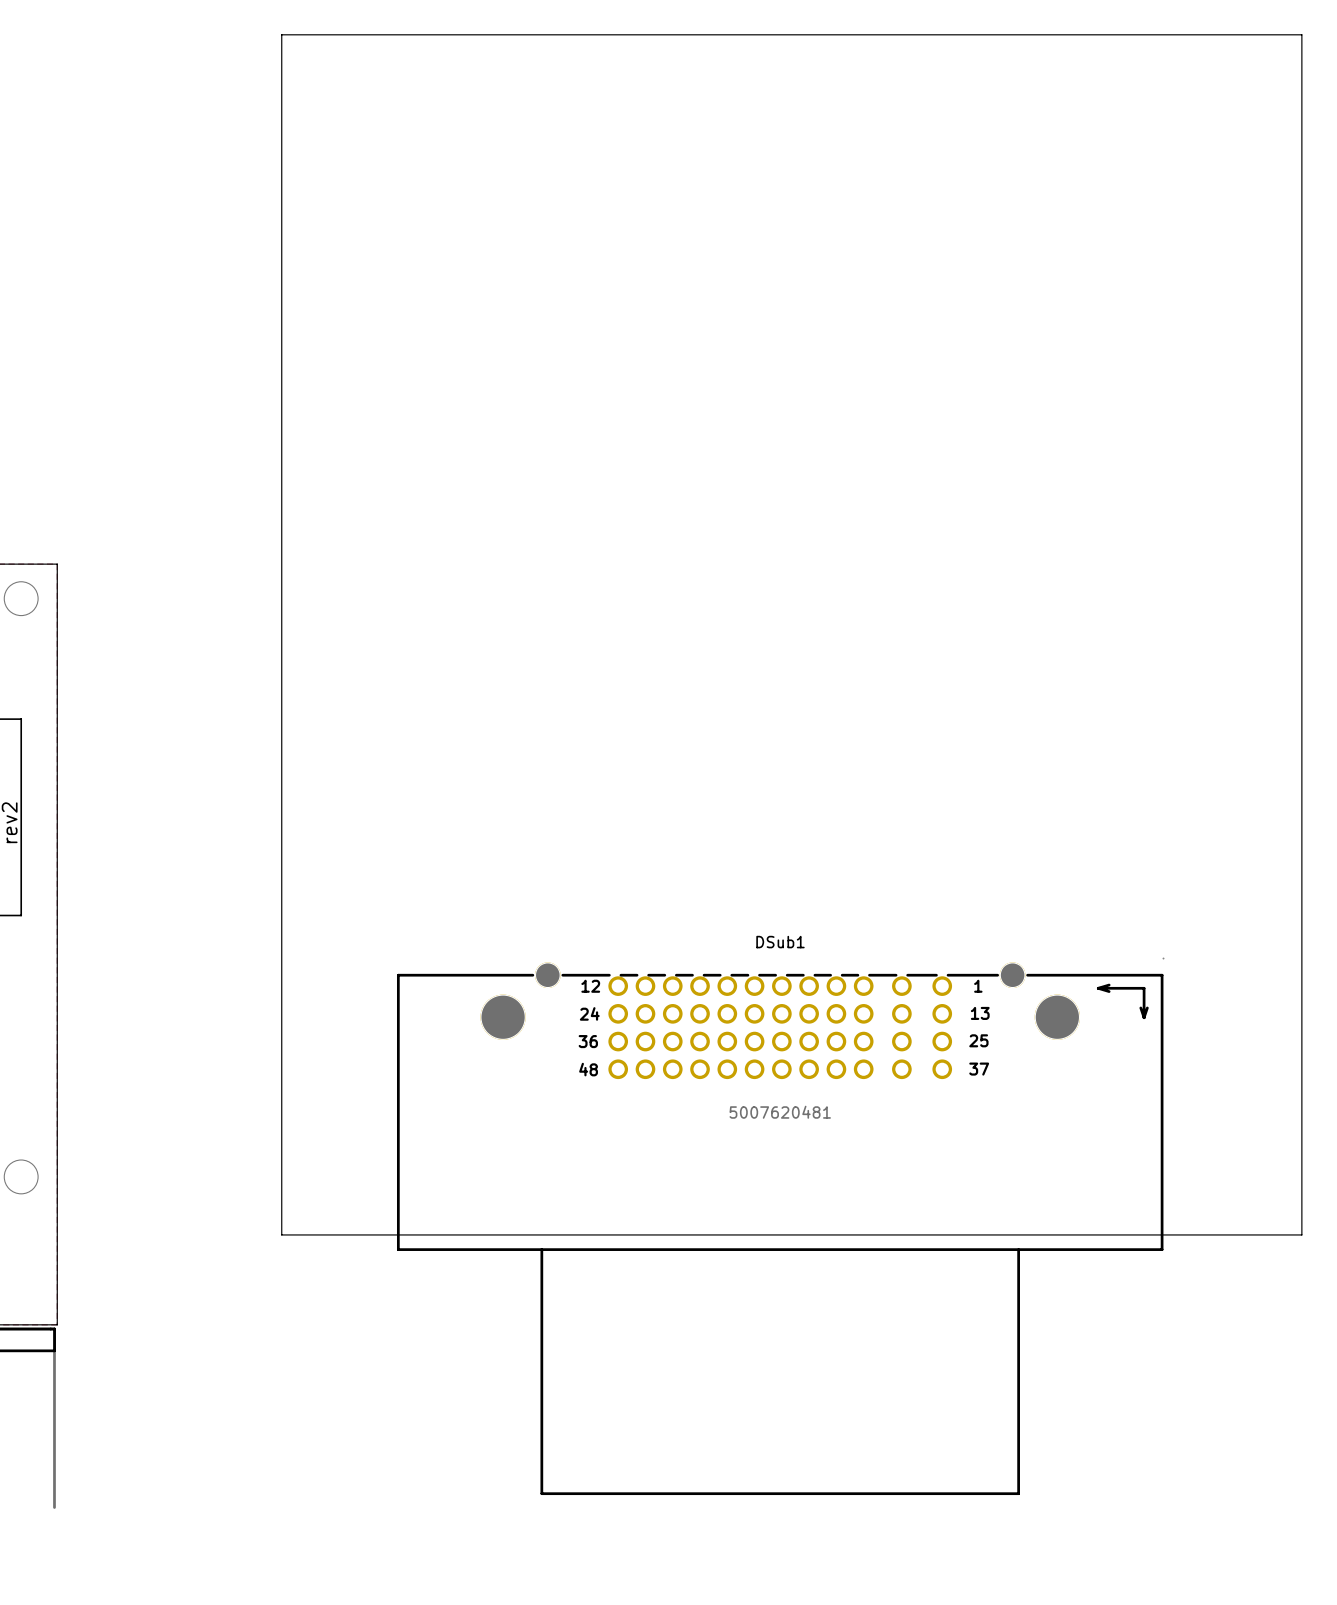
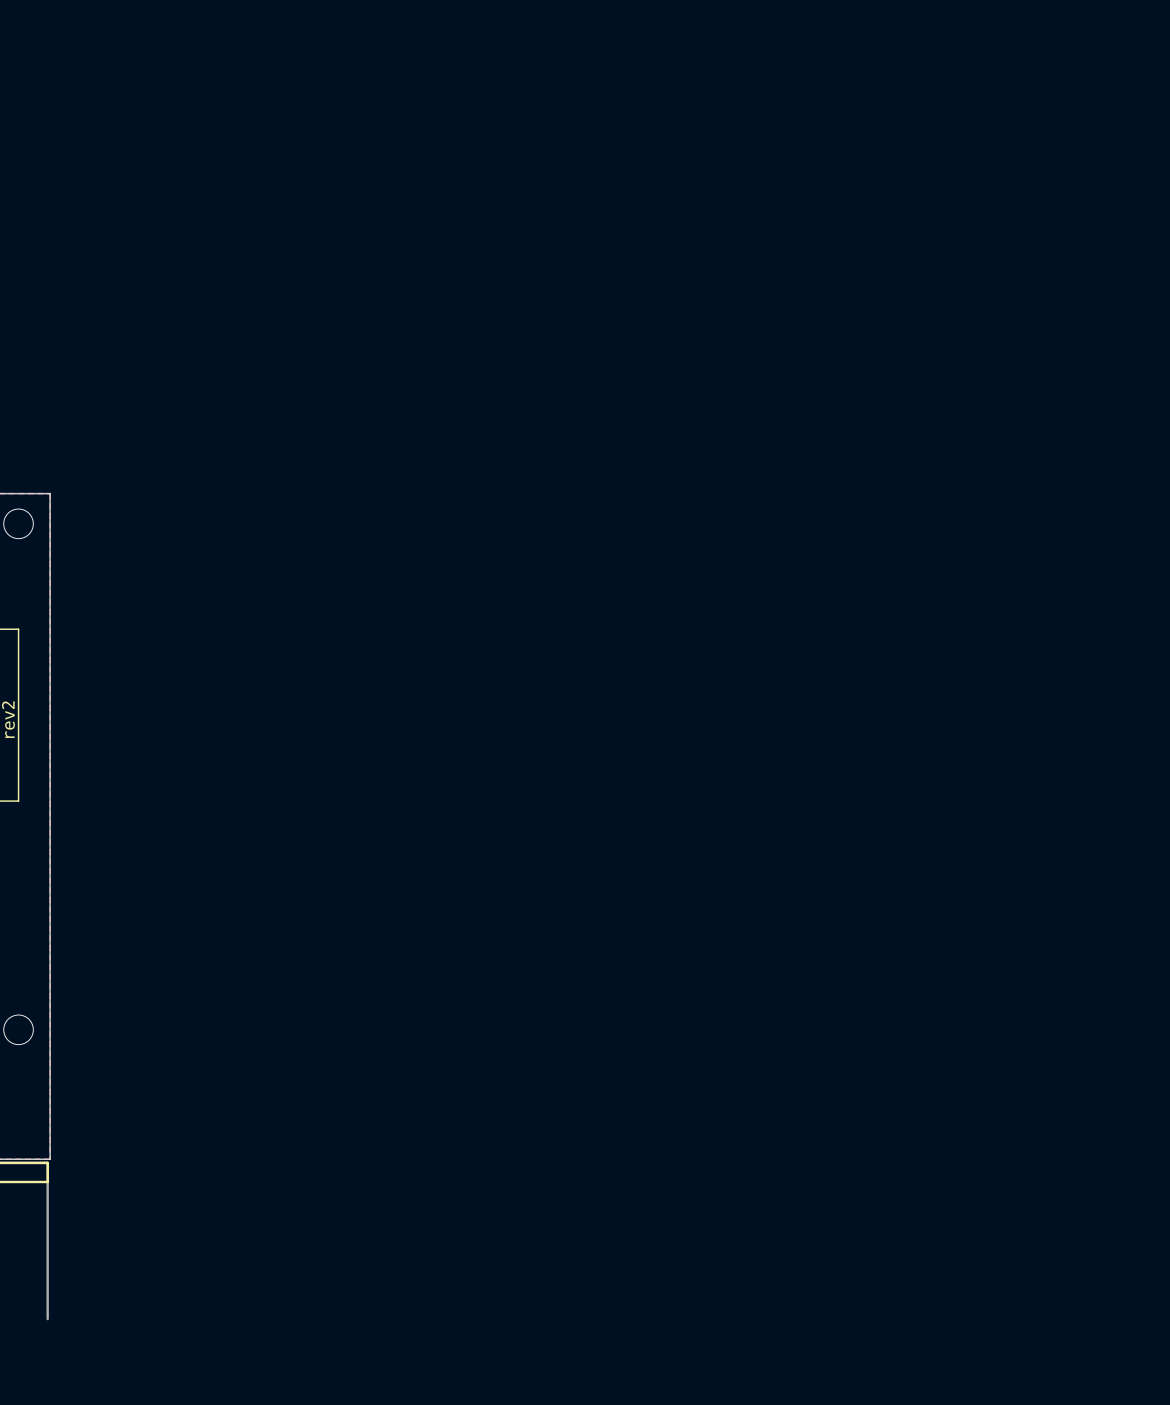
board edge: (281, 34) (1301, 34) (1301, 1234) (281, 1234) (281, 34) -> none
DSub1: 5007620481 (780, 1226) -> none

